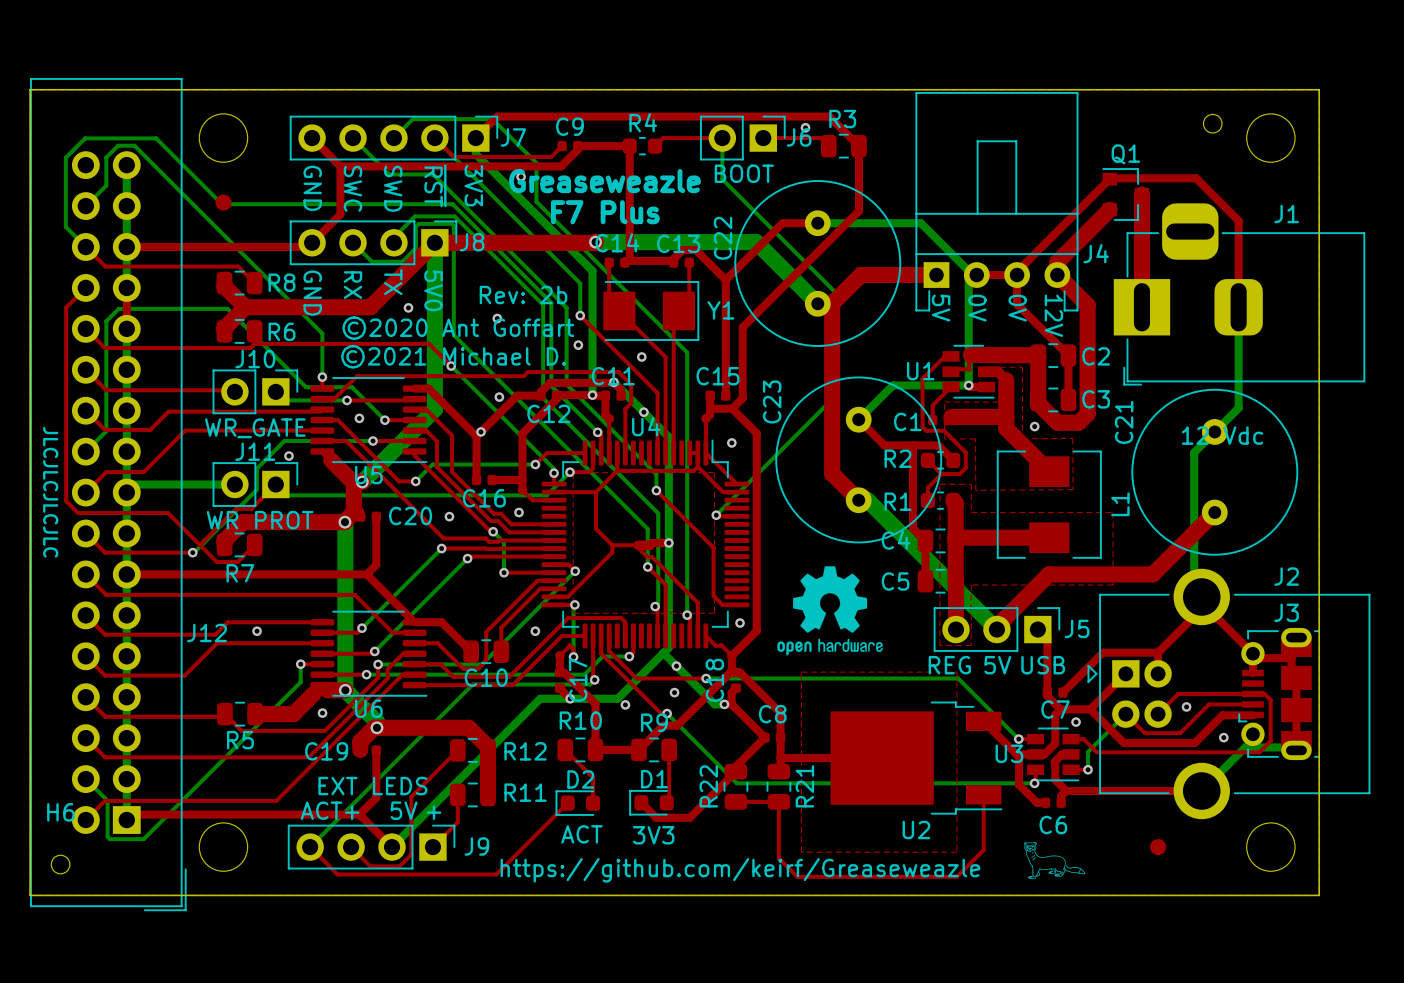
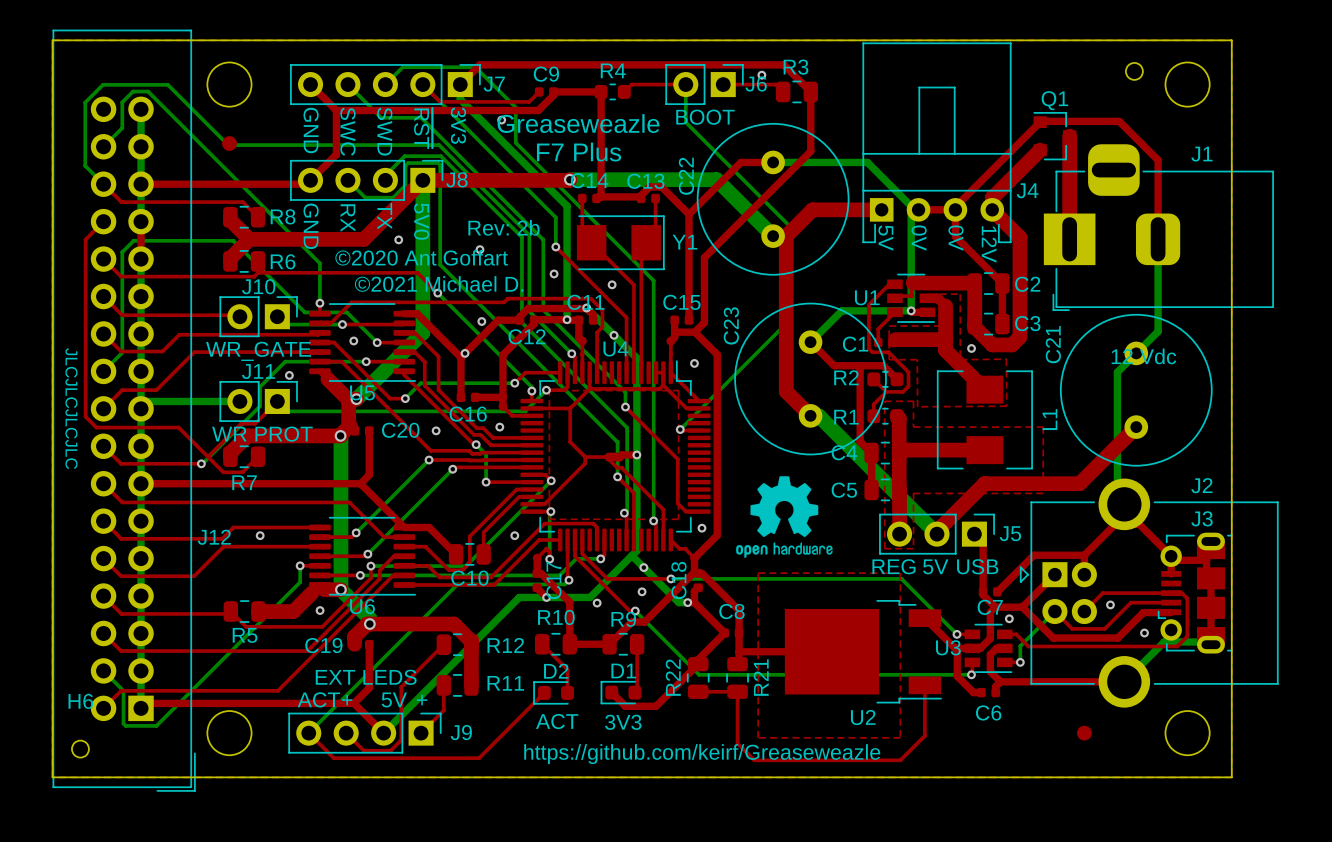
drawing: [1023, 841, 1086, 880] -> none

